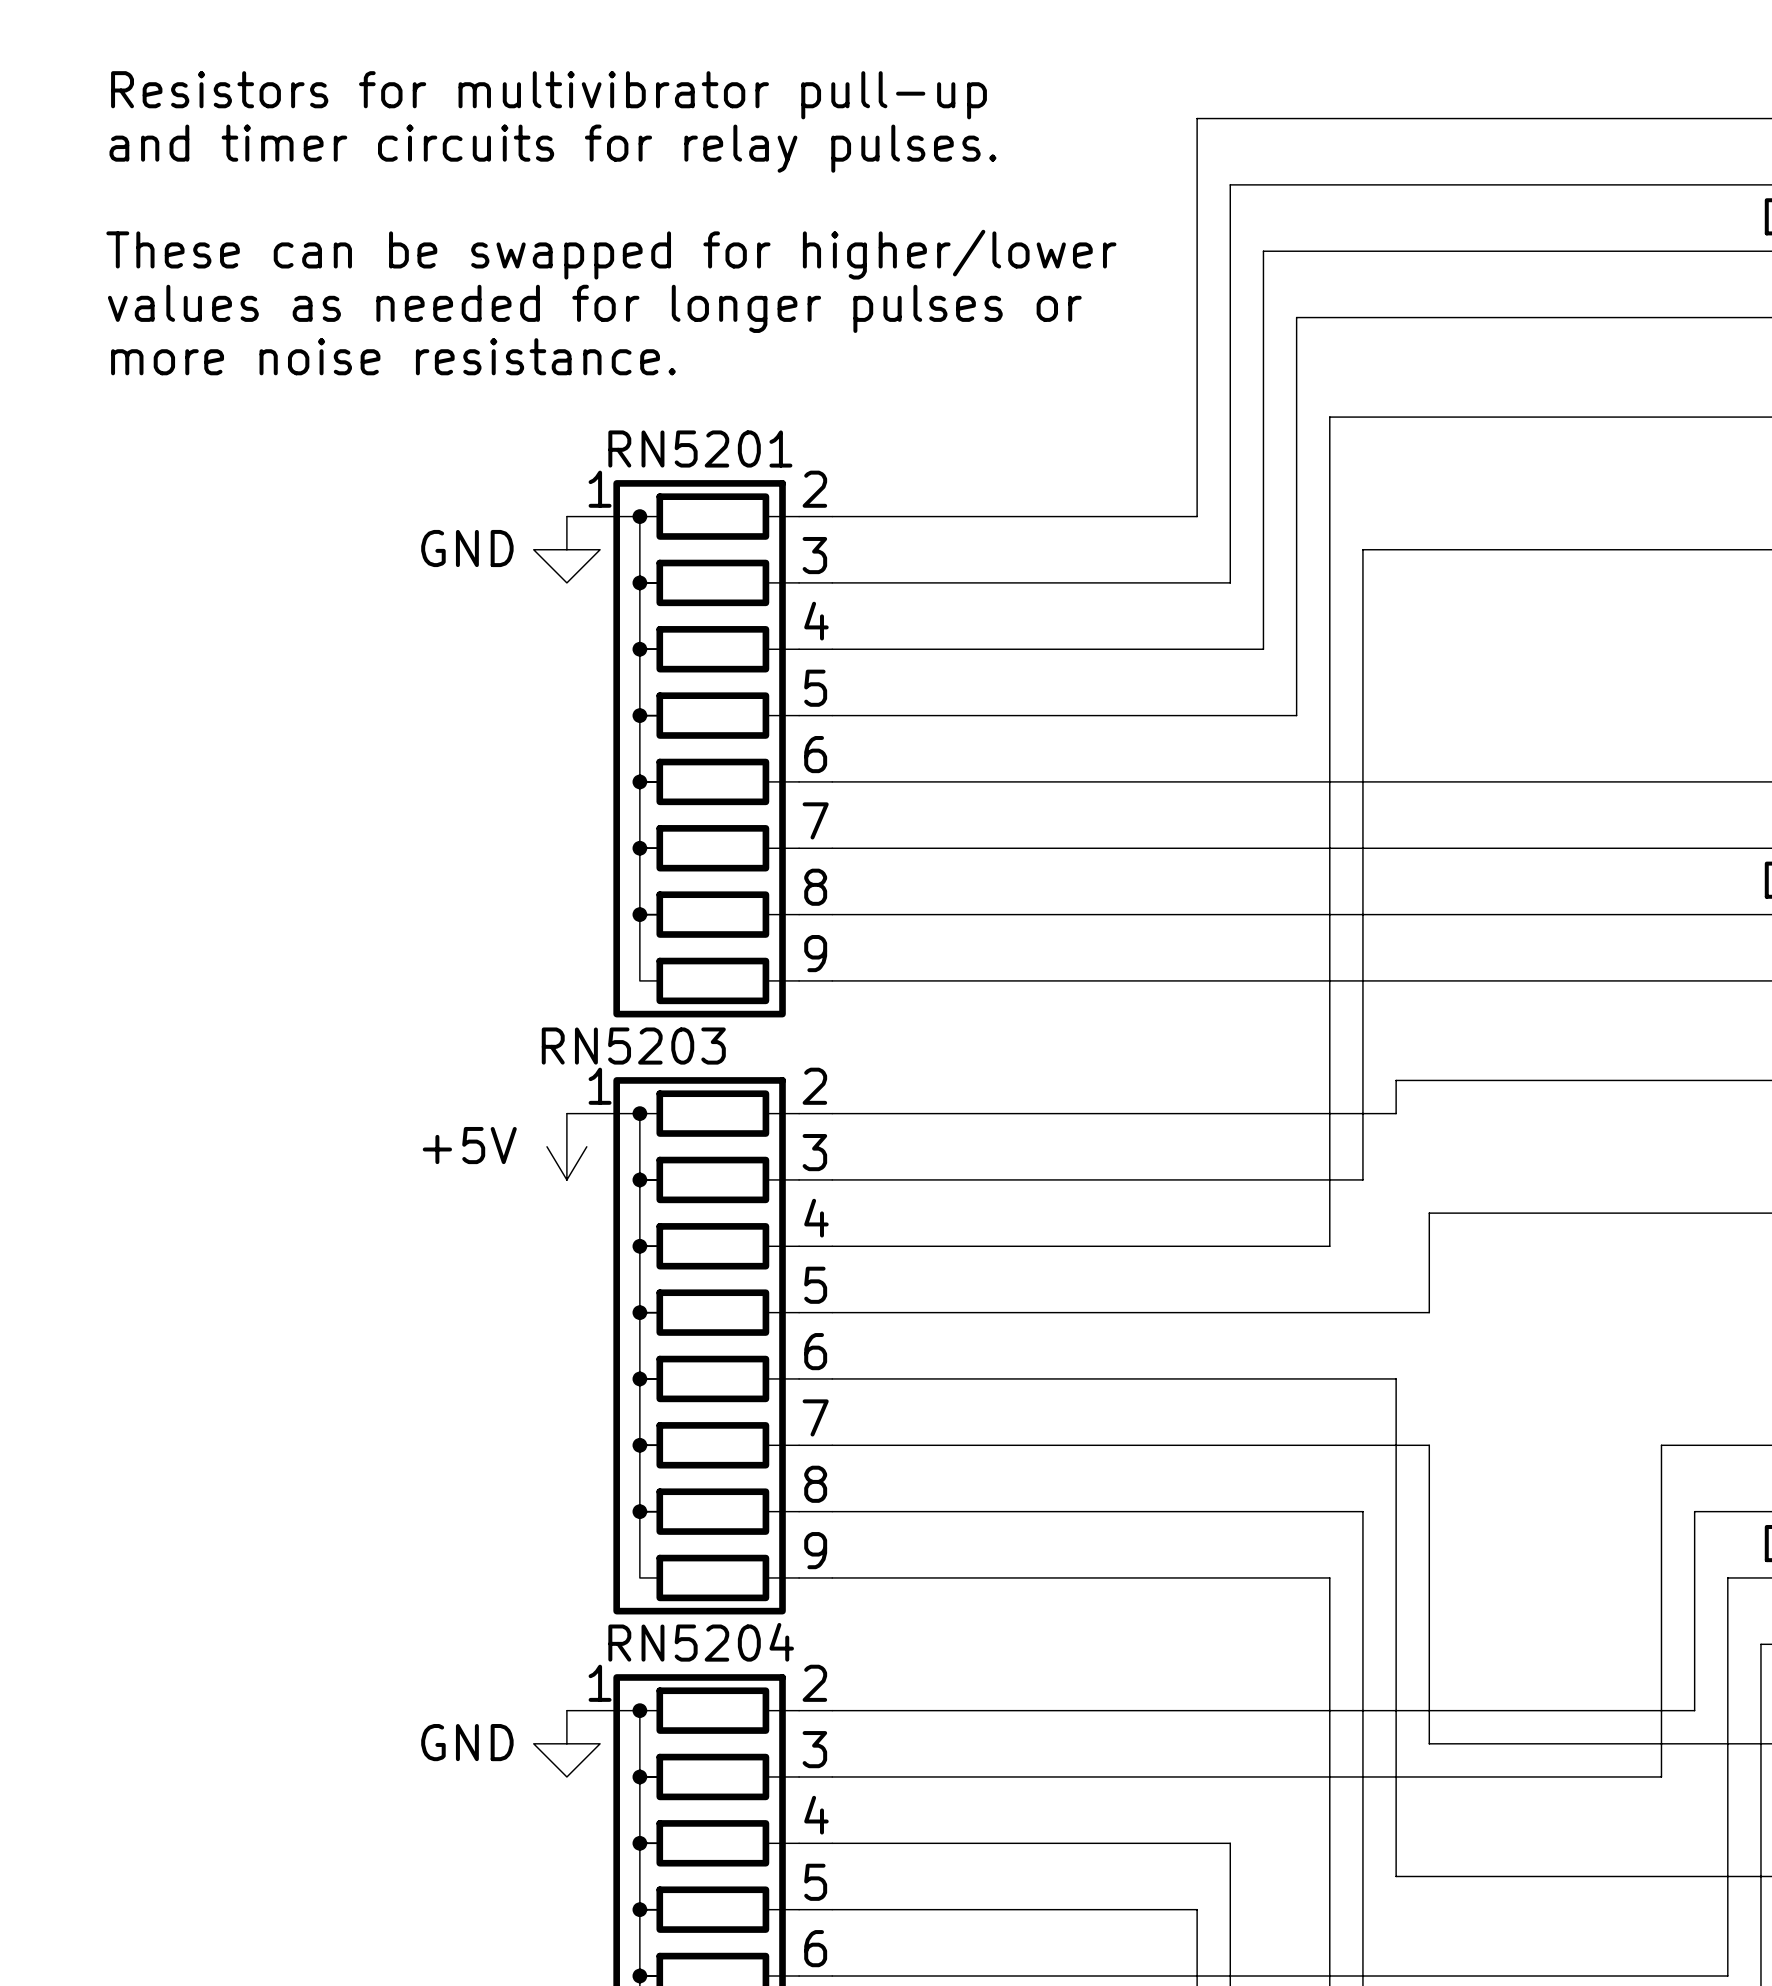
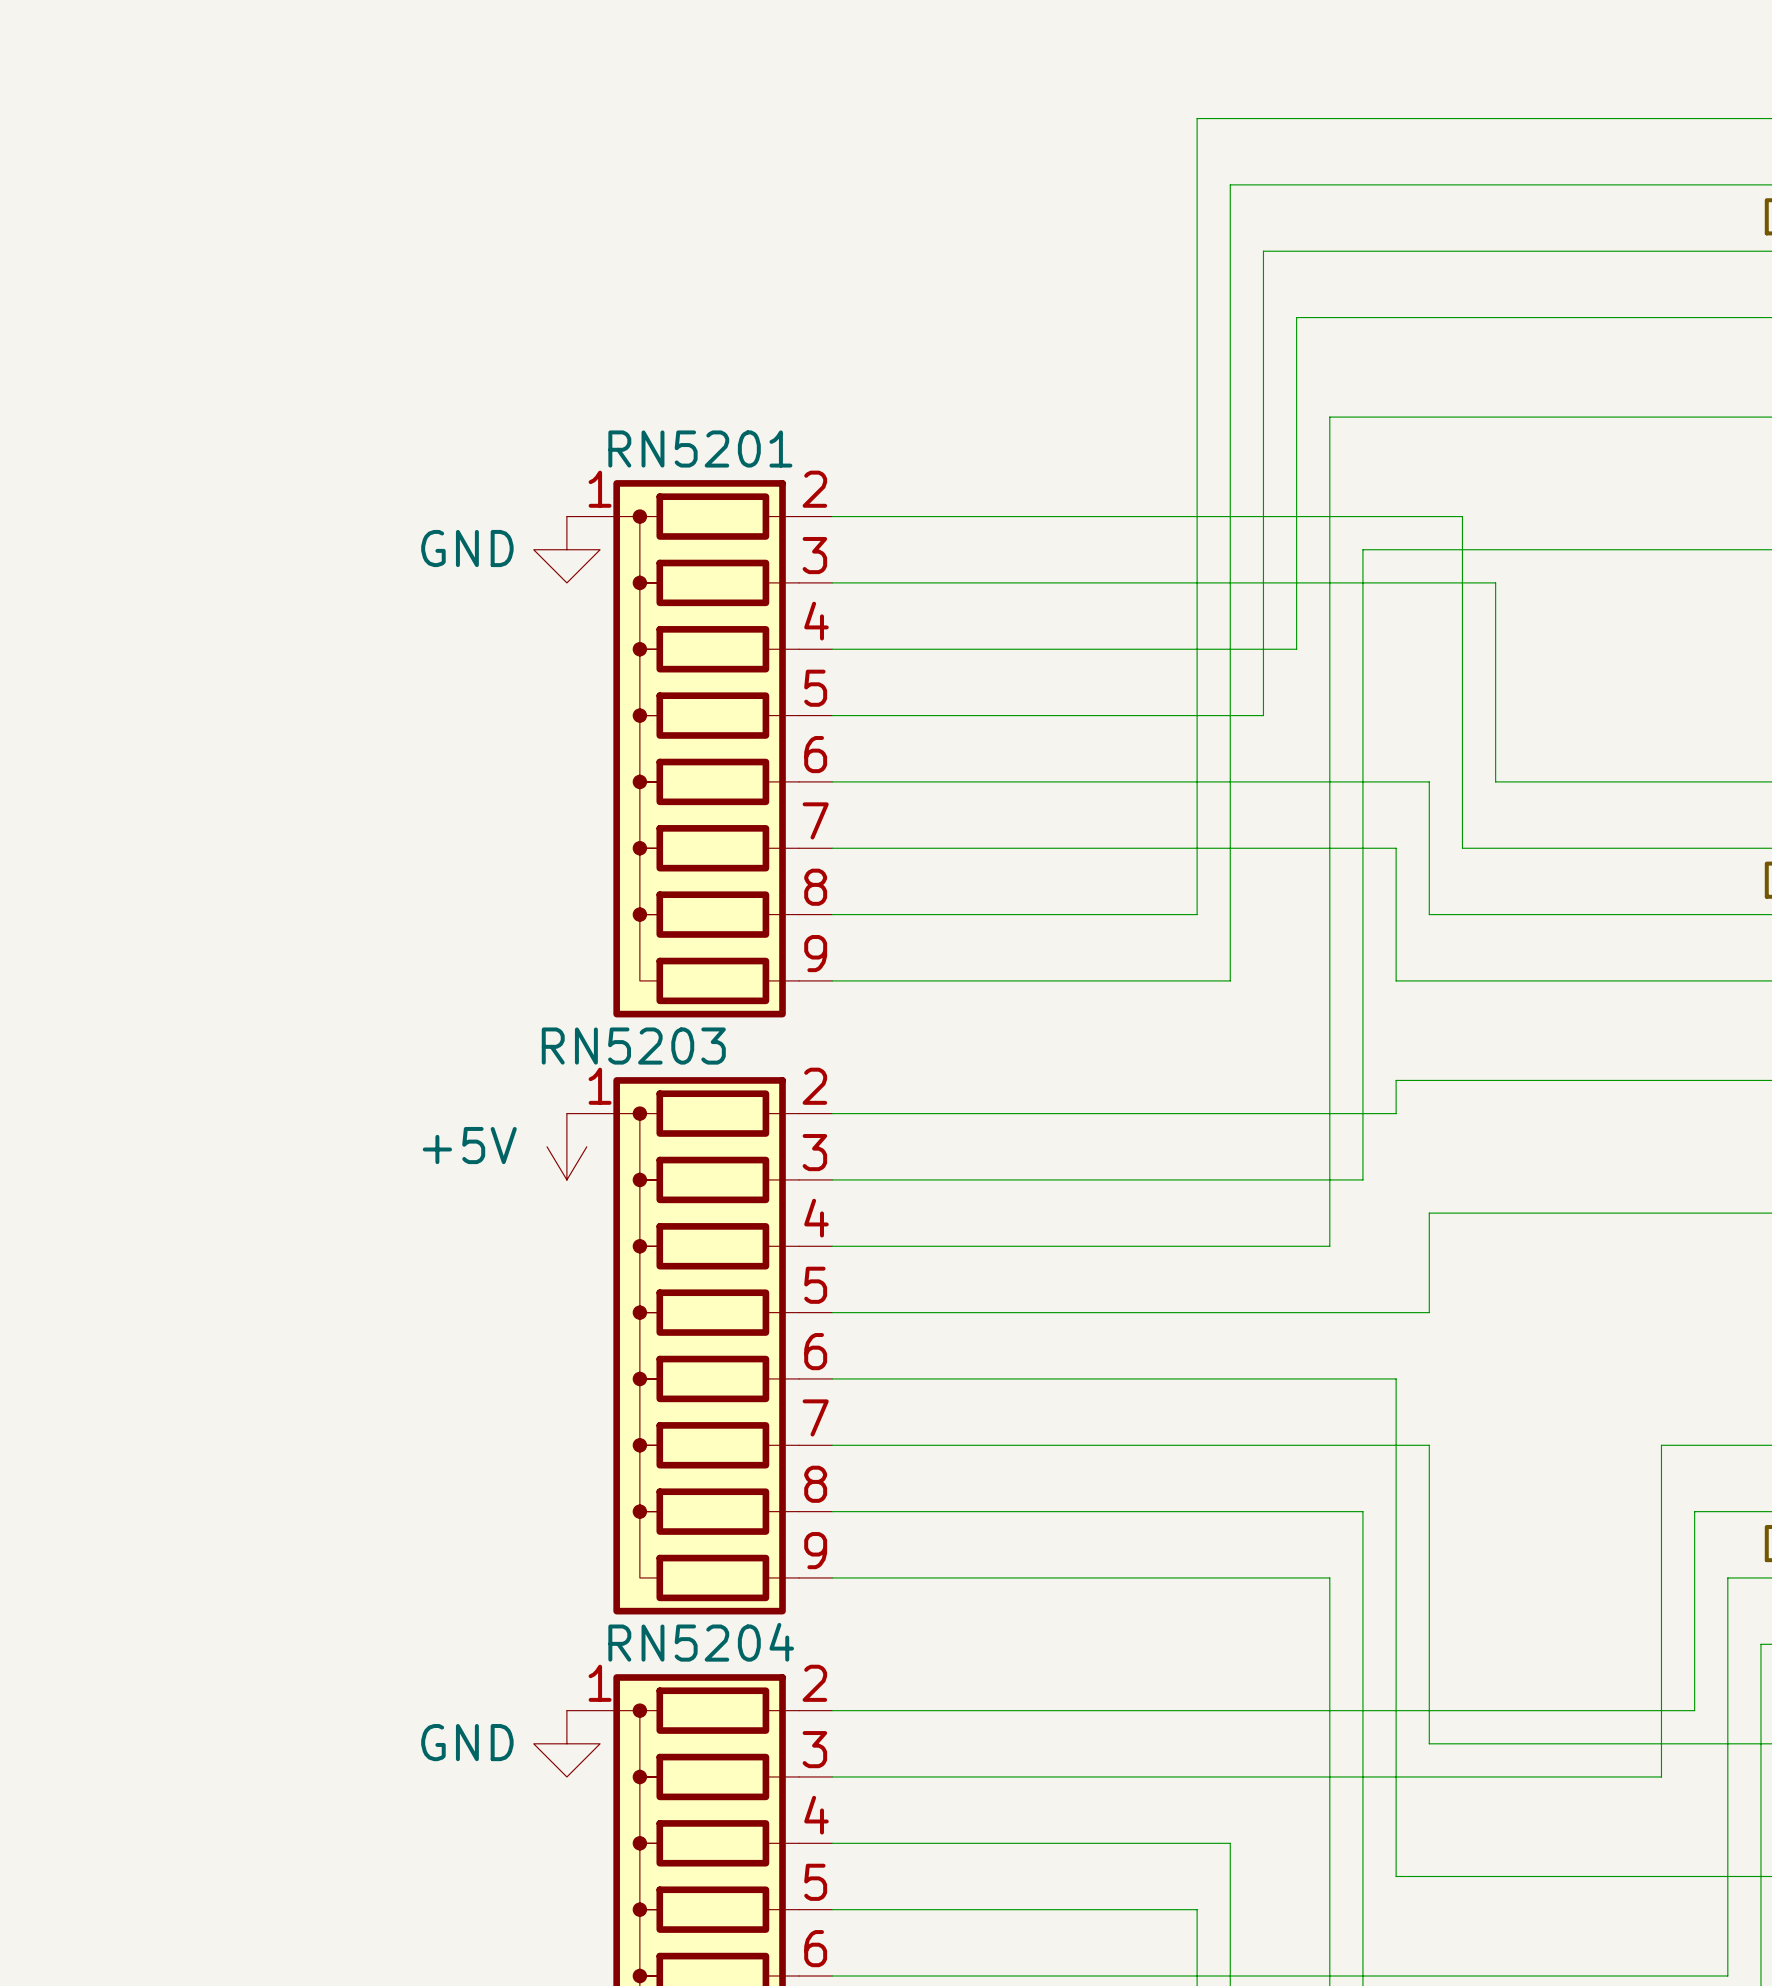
text: Resistors for multivibrator pull-up (548, 95) -> none
text: and timer circuits for relay pulses. (552, 148) -> none
text: These can be swapped for higher/lower (611, 254) -> none
text: values as needed for longer pulses or (594, 308) -> none
text: more noise resistance. (393, 356) -> none
wire: (1296, 649) (1296, 715) (1263, 715) -> (1296, 649) (1263, 649) (1263, 715)
wire: (1429, 781) (1495, 781) -> (1429, 781) (1429, 914)
wire: (1396, 848) (1462, 848) -> (1396, 848) (1396, 980)
wire: (1197, 914) (1429, 914) -> (1197, 914) (1197, 516) (1462, 516) (1462, 848)
wire: (1230, 980) (1396, 980) -> (1230, 980) (1230, 582) (1495, 582) (1495, 781)

